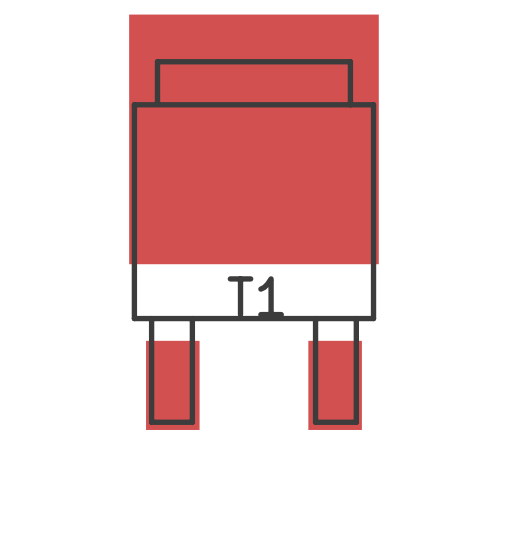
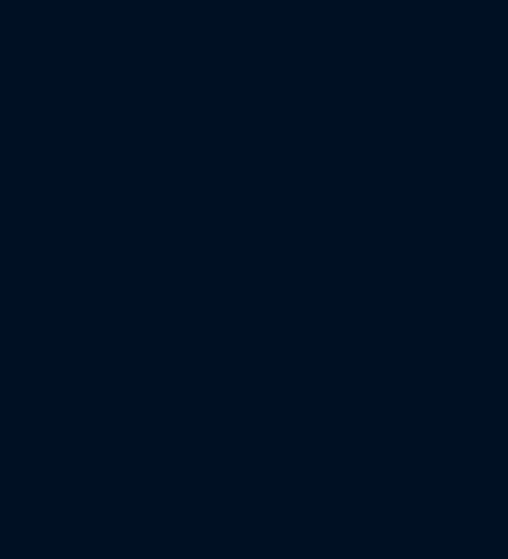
T1: (253, 222) -> none

